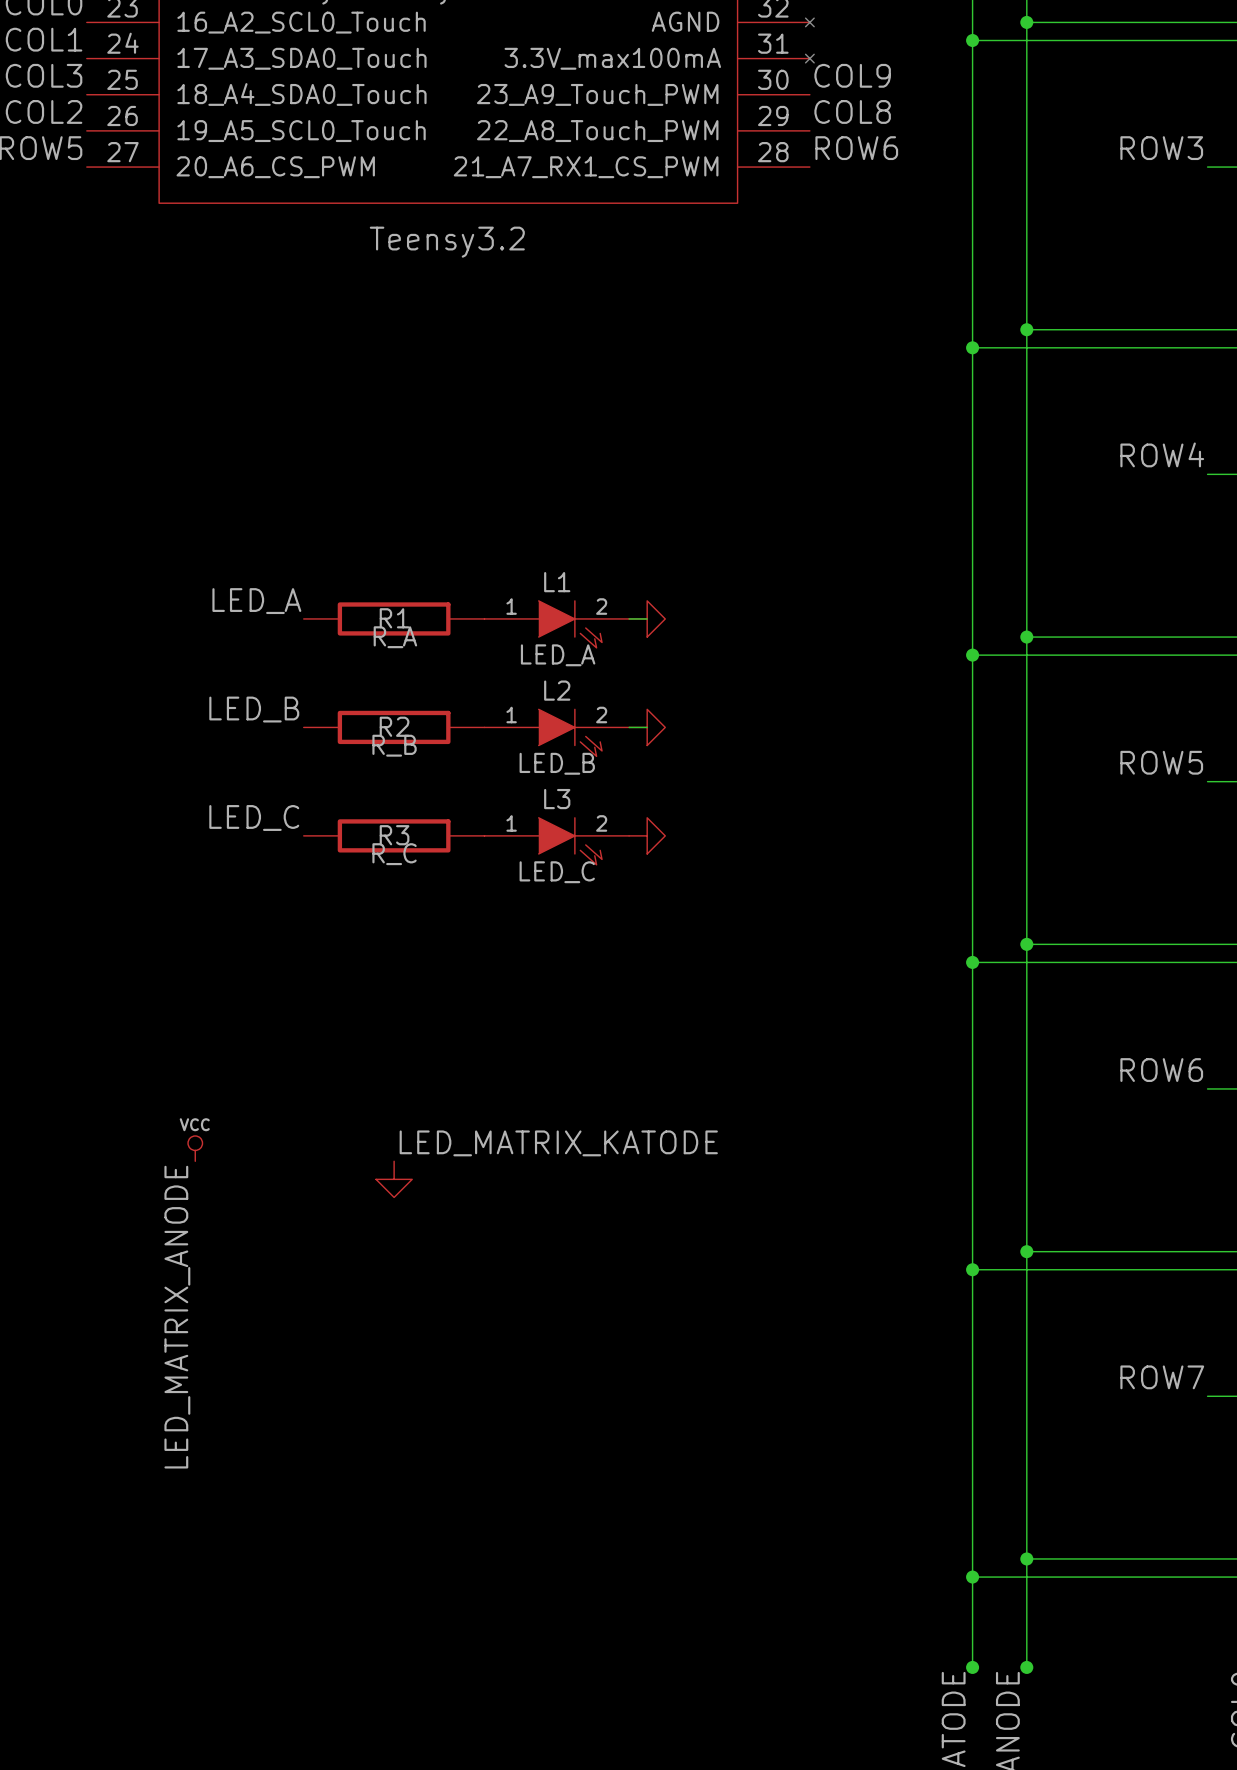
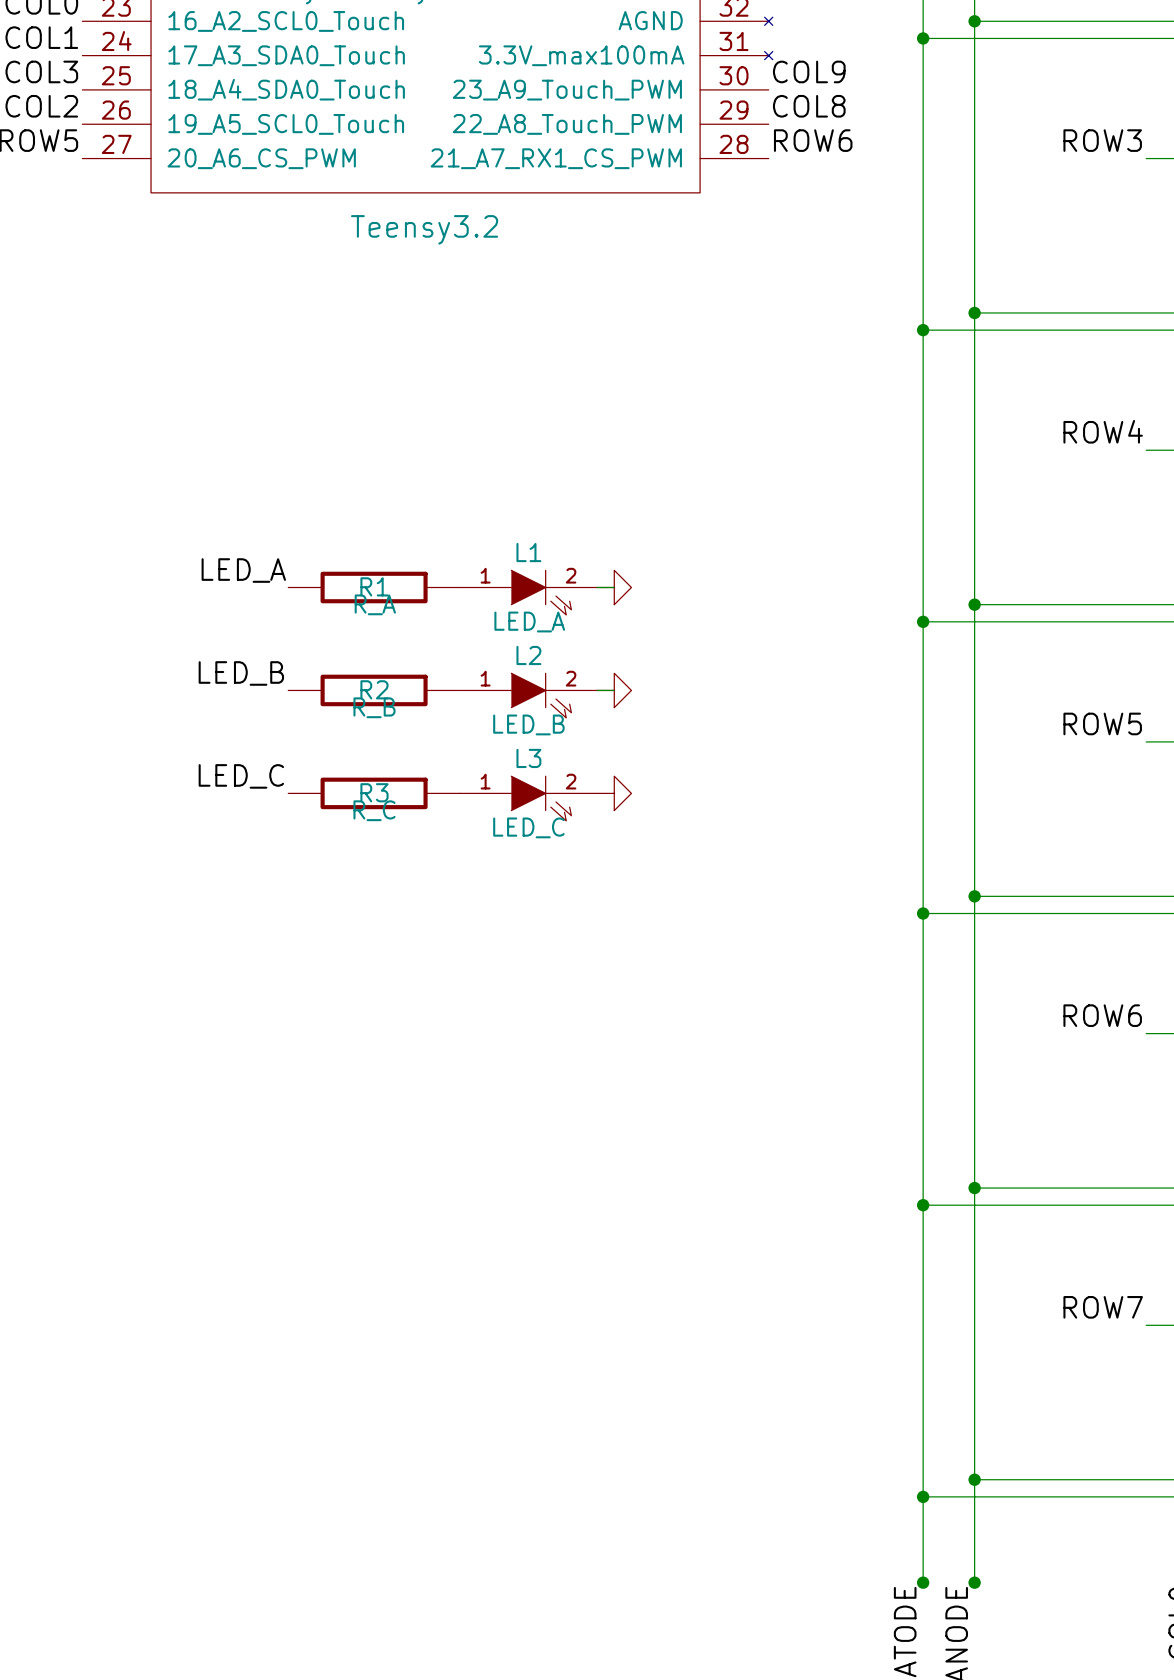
label: LED_MATRIX_KATODE (558, 1143) -> none
power symbol: VCC (195, 1148) -> none
power symbol: (394, 1179) -> none
label: LED_MATRIX_ANODE (177, 1317) -> none

